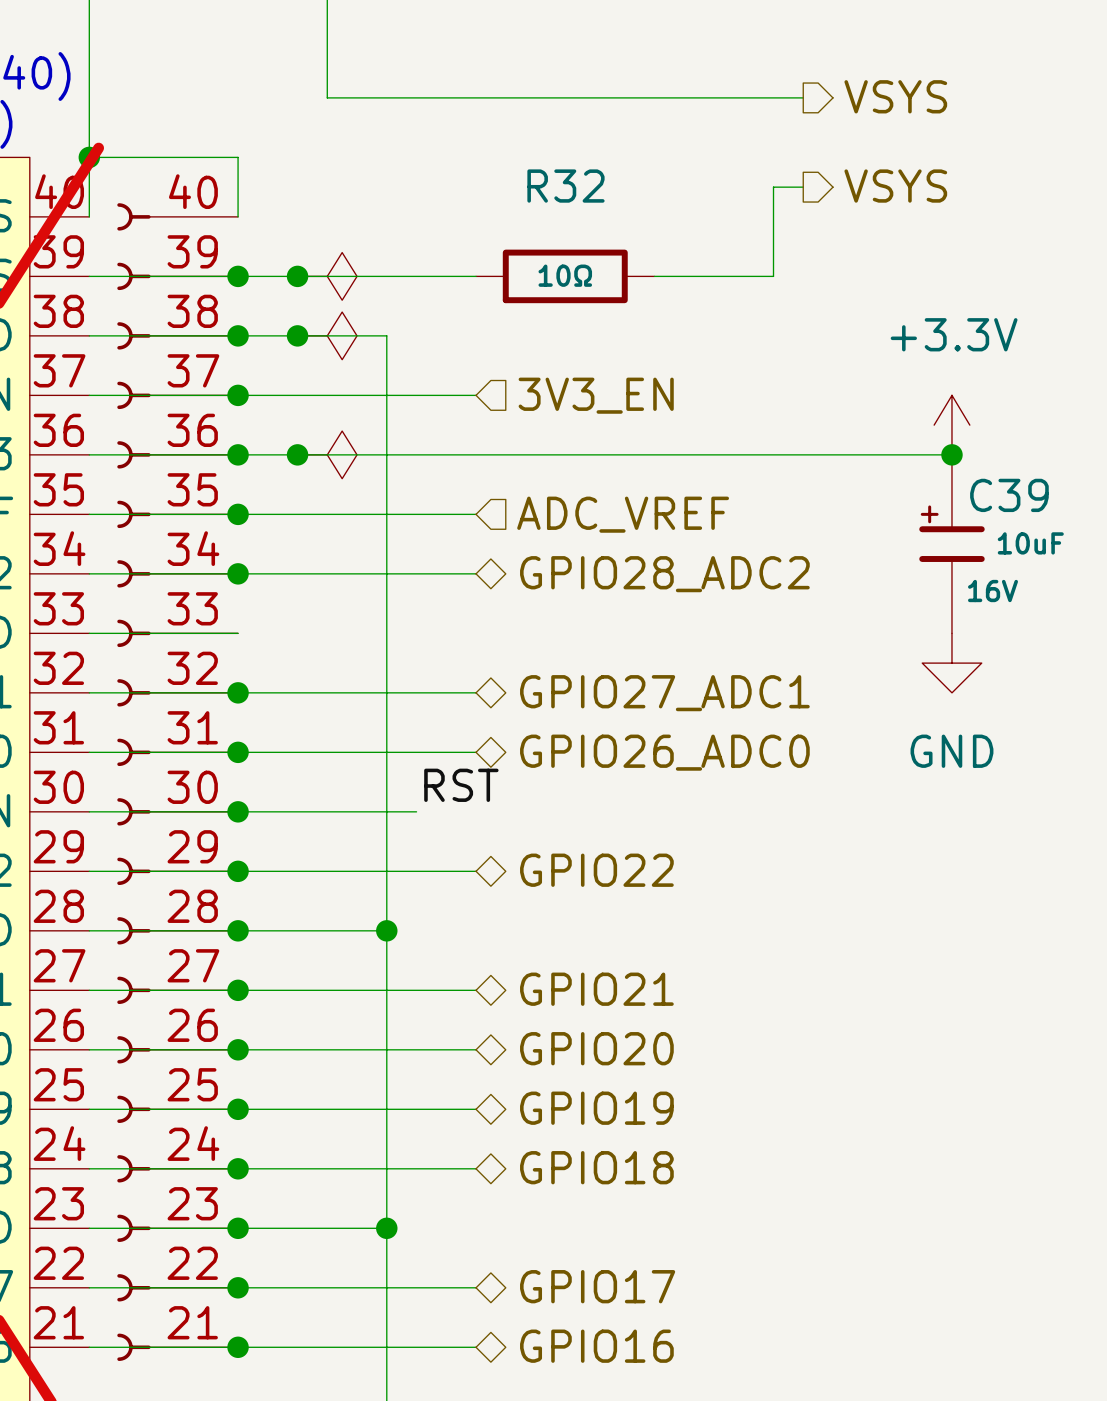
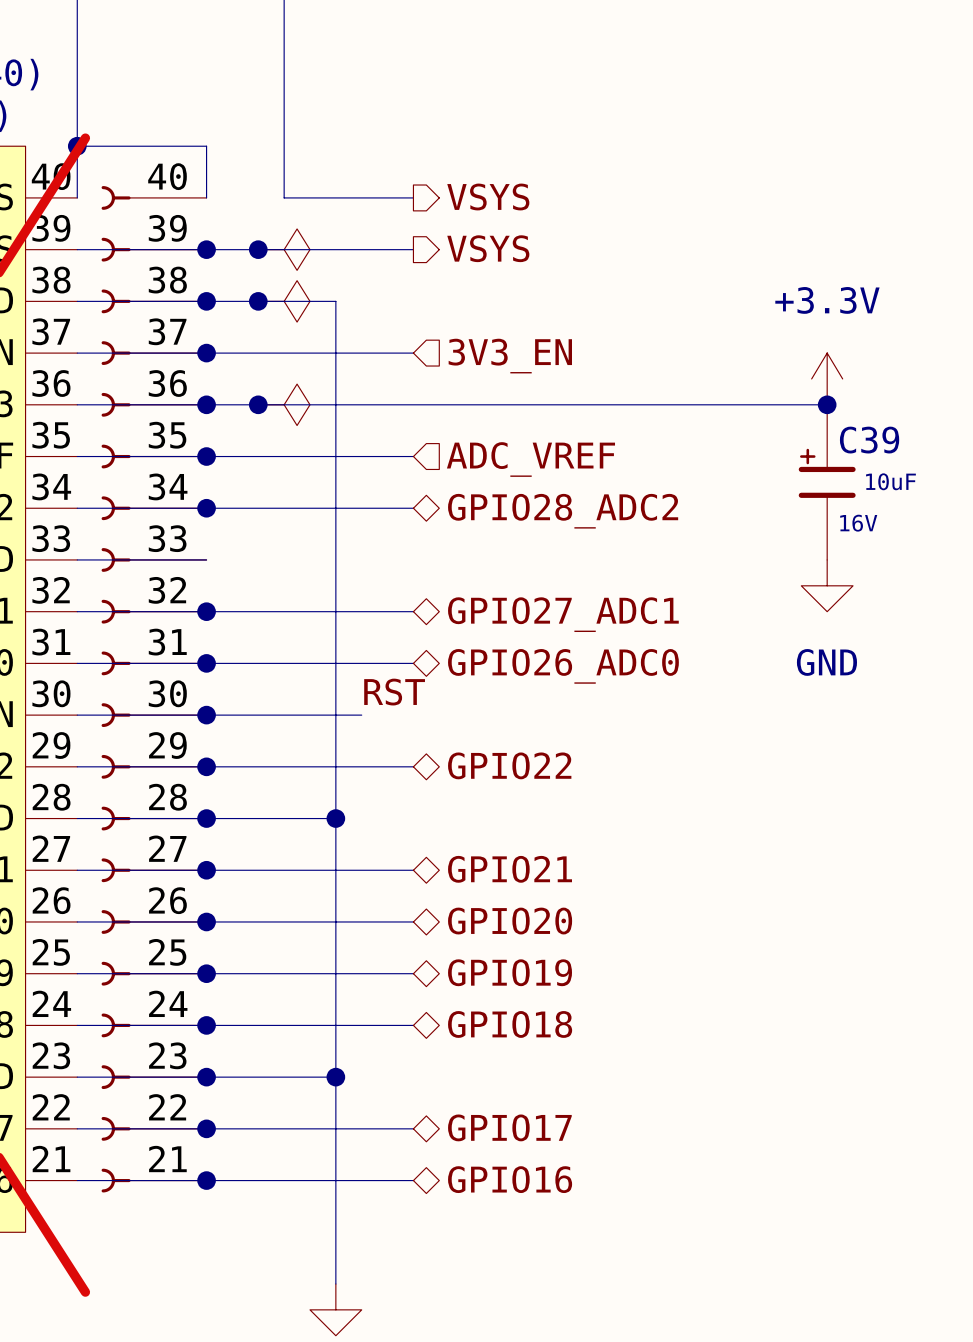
hierarchical label: VSYS (895, 96) -> none
wire: (327, 97) (803, 97) -> (284, 94) (284, 197) (413, 197)
hierarchical label: VSYS (895, 186) -> none
wire: (803, 187) (773, 187) (773, 276) (654, 276) -> none
hierarchical label: none -> VSYS (488, 196)
hierarchical label: none -> VSYS (488, 248)
R32: 10Ω (565, 276) -> none

